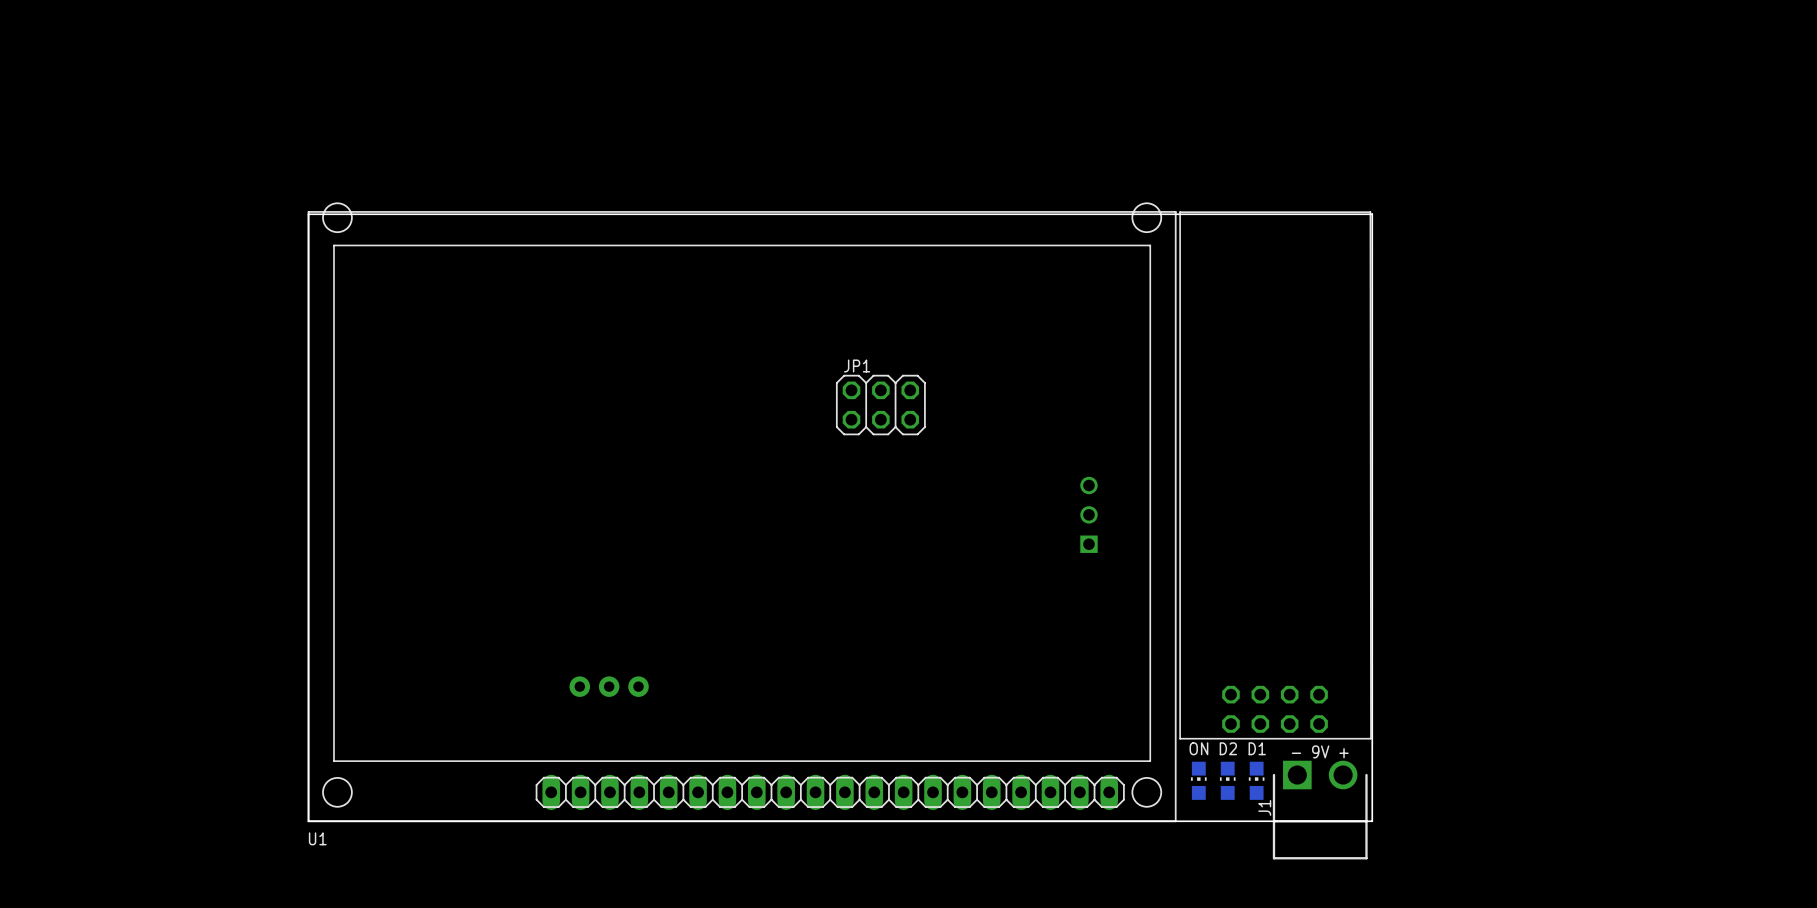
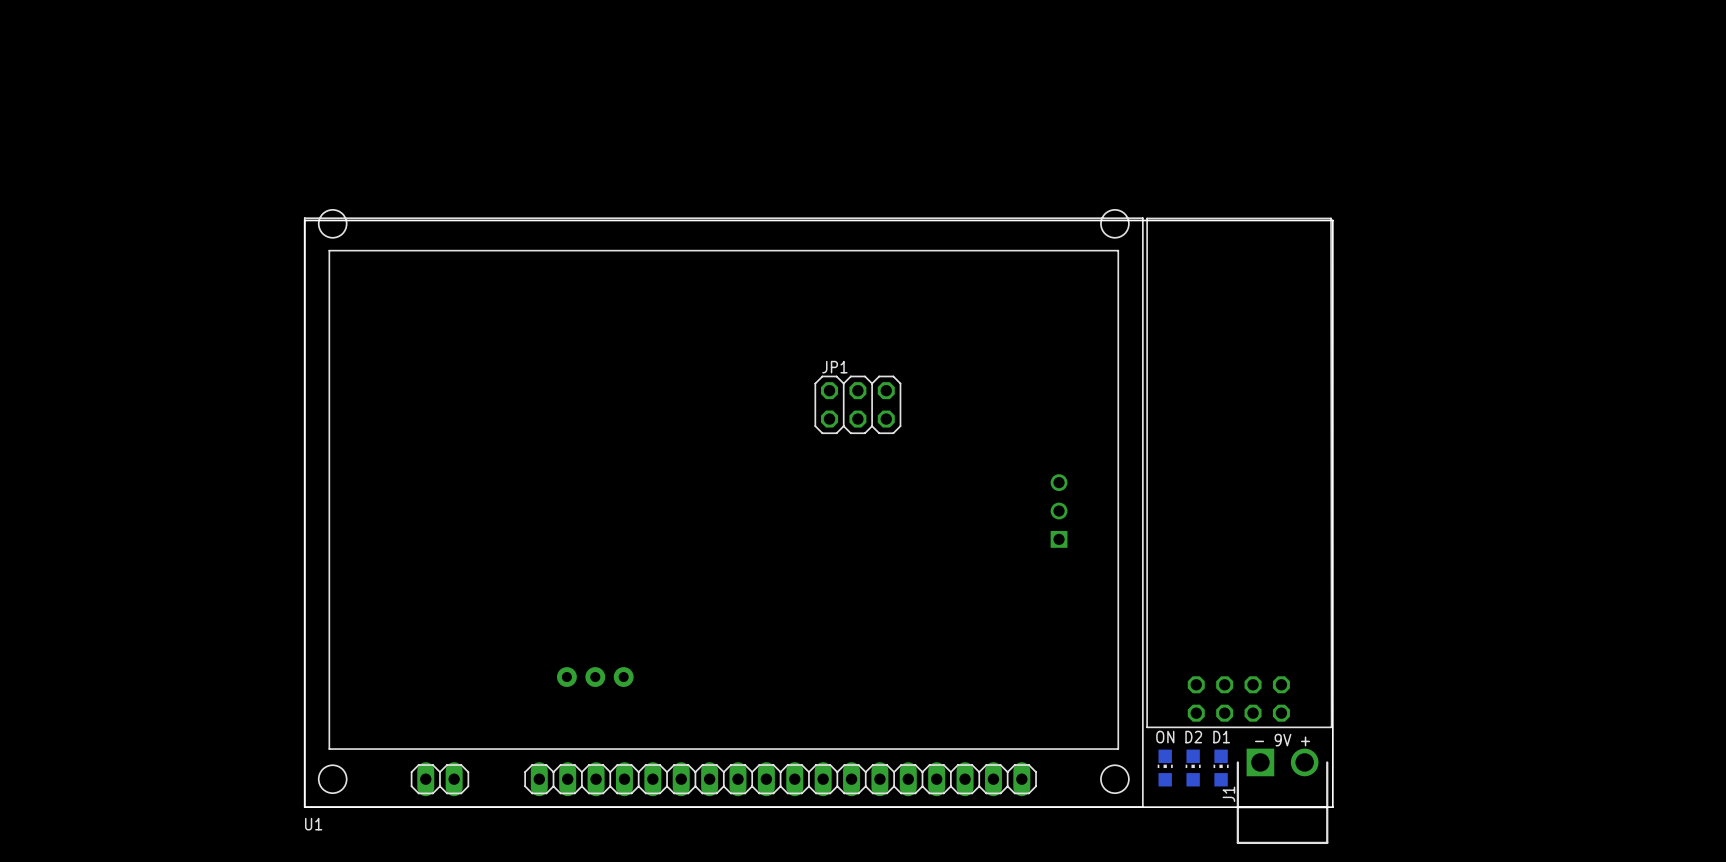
U1 footprint: [307, 202, 1177, 823] -> [303, 209, 1144, 808]

